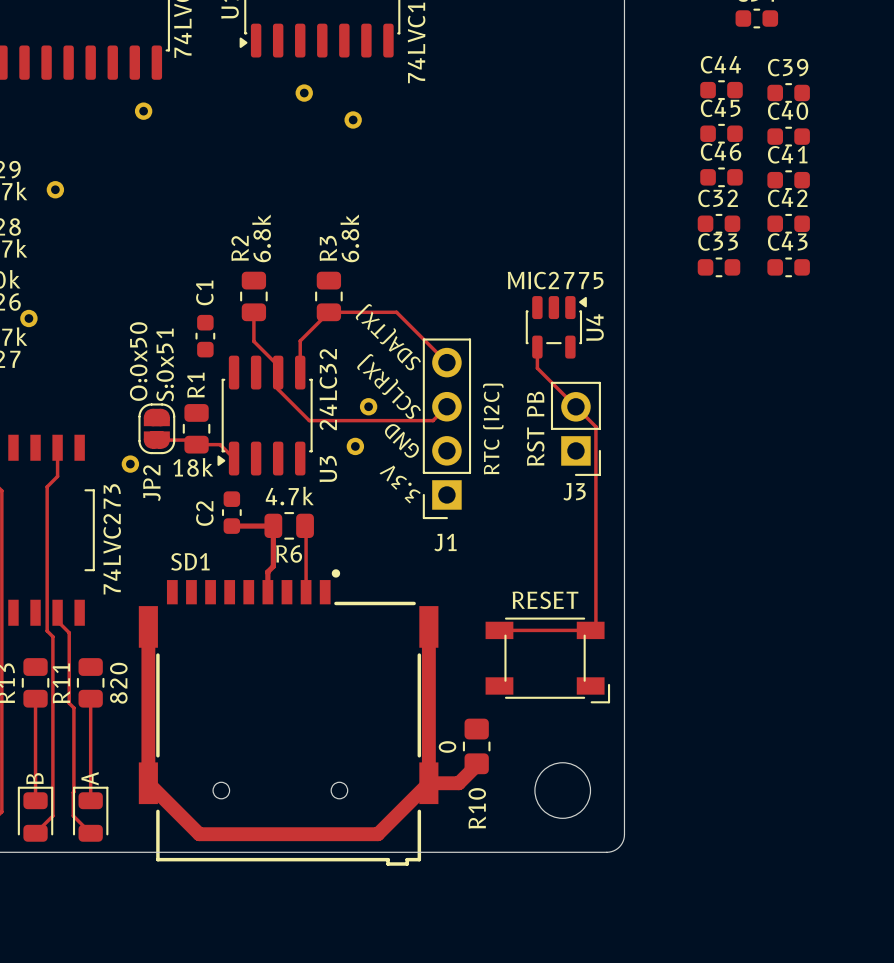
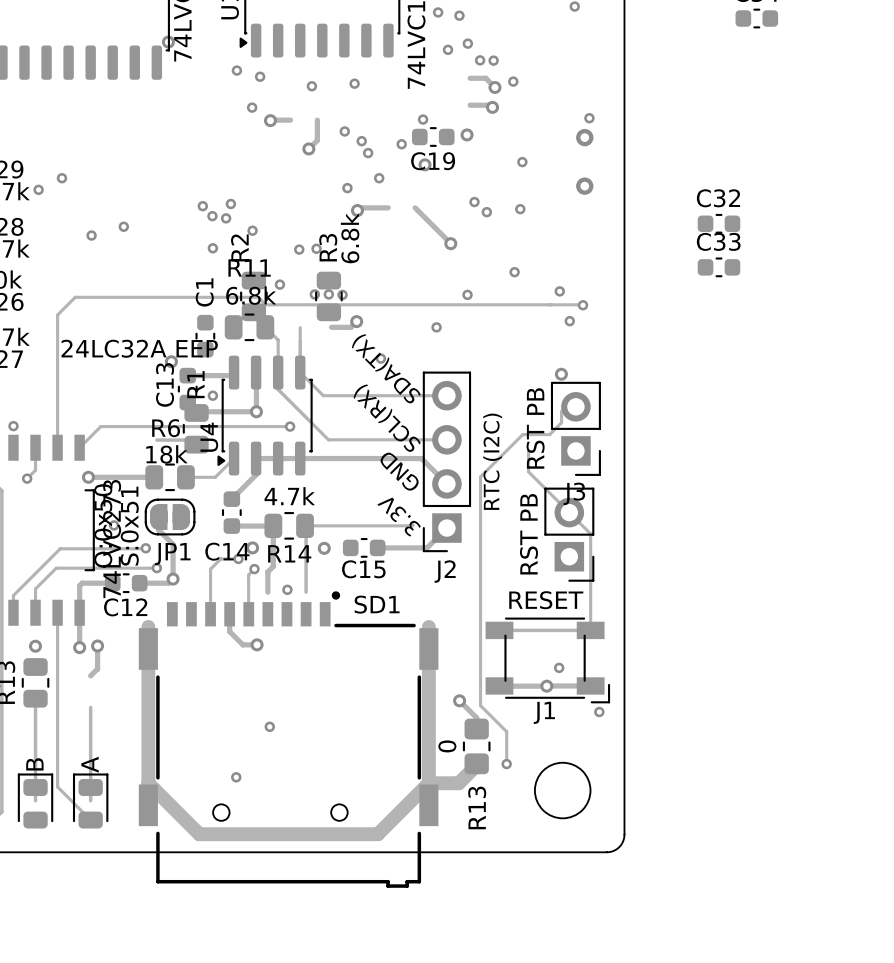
via: none -> (574, 6)
via: none -> (438, 12)
via: none -> (459, 15)
via: none -> (168, 42)
via: none -> (467, 43)
via: none -> (448, 49)
via: none -> (480, 60)
via: none -> (493, 60)
via: none -> (236, 70)
via: none -> (260, 76)
track: none -> (470, 78) (485, 78) (495, 87)
via: none -> (513, 81)
via: none -> (354, 83)
via: none -> (311, 86)
via: none -> (495, 87)
C44: (721, 90) -> none
C39: (788, 92) -> none
part: (304, 93) -> none
track: none -> (470, 105) (490, 105) (492, 107)
via: none -> (252, 107)
via: none -> (492, 107)
part: (143, 111) -> none
via: none -> (589, 118)
part: (353, 119) -> none
via: none -> (423, 119)
via: none -> (270, 120)
track: none -> (290, 120) (270, 120)
track: none -> (317, 120) (317, 140) (308, 148)
via: none -> (344, 131)
C45: (721, 133) -> none
via: none -> (467, 134)
C40: (788, 136) -> none
C19: none -> (433, 137)
part: none -> (584, 137)
via: none -> (361, 141)
via: none -> (401, 144)
via: none -> (308, 148)
via: none -> (368, 153)
via: none -> (522, 162)
via: none -> (424, 164)
C46: (721, 177) -> none
via: none -> (62, 178)
via: none -> (379, 178)
C41: (788, 180) -> none
part: none -> (584, 186)
via: none -> (347, 188)
via: none -> (38, 189)
part: (55, 189) -> none
via: none -> (474, 202)
via: none -> (230, 203)
via: none -> (202, 206)
track: none -> (388, 207) (360, 207) (357, 210)
track: none -> (415, 207) (450, 243)
via: none -> (520, 209)
via: none -> (357, 210)
via: none -> (486, 212)
via: none -> (212, 216)
via: none -> (226, 218)
C42: (788, 223) -> none
via: none -> (123, 226)
via: none -> (252, 230)
via: none -> (91, 235)
R2 value: 6.8k (261, 238) -> none
via: none -> (450, 243)
via: none -> (212, 248)
via: none -> (316, 248)
via: none -> (299, 249)
C43: (788, 267) -> none
via: none -> (514, 272)
via: none -> (279, 284)
via: none -> (559, 291)
via: none -> (314, 294)
via: none -> (328, 294)
via: none -> (342, 294)
via: none -> (467, 294)
via: none -> (583, 305)
track: (253, 312) (253, 341) (278, 365) -> none
part: (28, 318) -> none
track: none -> (356, 321) (350, 327) (331, 327)
via: none -> (356, 321)
via: none -> (569, 321)
track: none -> (265, 327) (278, 340) (278, 372)
via: none -> (436, 327)
U4: MIC2775 (556, 327) -> none
J1 text: SDA(TX) (388, 337) -> none
J1 footprint: [422, 338, 472, 520] -> [544, 487, 595, 582]
track: (300, 340) (328, 312) (396, 312) (446, 362) -> (300, 340) (300, 327)
track: (537, 347) (537, 368) (595, 426) (595, 625) -> none
via: none -> (380, 358)
via: none -> (171, 361)
track: none -> (234, 372) (231, 375) (187, 375)
track: none -> (256, 372) (256, 411) (196, 411) (187, 402)
track: none -> (300, 372) (323, 395) (446, 395)
via: none -> (561, 374)
J1 text: SCL(RX) (389, 386) -> none
C13: none -> (187, 389)
U3 value: 24LC32 (328, 389) -> 24LC32A EEP (139, 348)
via: none -> (212, 395)
part: (368, 406) -> none
track: (446, 406) (433, 420) (309, 420) -> (446, 439) (328, 439) (309, 420)
via: none -> (256, 411)
track: none -> (561, 411) (561, 422) (549, 434) (522, 434) (480, 476) (480, 705) (506, 731) (506, 764)
via: none -> (13, 426)
track: none -> (290, 426) (100, 426) (79, 447)
via: none -> (290, 426)
JP2: (156, 428) -> none
J1 text: RTC (I2C) (493, 429) -> RST PB (528, 534)
J1 text: GND (401, 441) -> none
track: (196, 444) (220, 444) (234, 458) -> (185, 477) (215, 477) (234, 458)
part: (355, 446) -> none
track: none -> (35, 447) (35, 470) (27, 478)
track: (57, 447) (57, 476) (47, 486) (47, 630) (52, 636) (52, 815) (35, 833) -> (57, 447) (57, 314) (75, 297) (258, 297) (265, 304) (583, 305)
track: none -> (528, 450) (528, 471) (590, 533) (590, 630)
J2: none -> (446, 461)
part: (130, 464) -> none
R1 value: 18k (193, 467) -> none
U3 name: U3 (328, 469) -> U4 (209, 437)
track: none -> (88, 477) (154, 477)
via: none -> (88, 477)
R6: none -> 18k (170, 477)
via: none -> (27, 478)
track: none -> (446, 483) (421, 458) (256, 458) (256, 474) (231, 499)
J1 text: 3.3V (400, 484) -> none
C2 name: C2 (204, 513) -> C14 (227, 551)
track: none -> (158, 517) (158, 530) (173, 544) (173, 579) (168, 583) (139, 583)
JP1: none -> (170, 517)
track: none -> (413, 524) (305, 525)
via: none -> (114, 525)
track: none -> (446, 528) (427, 547) (377, 547)
J1 name position: J1 (445, 542) -> J1 (544, 712)
via: none -> (252, 547)
C15: none -> (364, 547)
track: none -> (145, 548) (60, 548) (13, 595) (13, 612)
via: none -> (145, 548)
via: none -> (324, 548)
R6 name: R6 (289, 553) -> R14 (289, 553)
track: none -> (238, 558) (220, 558) (210, 569) (210, 614)
via: none -> (238, 558)
SD1 name position: SD1 (190, 561) -> SD1 (377, 604)
track: none -> (156, 568) (56, 568) (35, 588) (35, 612)
via: none -> (156, 568)
track: none -> (254, 569) (248, 574) (248, 614)
via: none -> (254, 569)
via: none -> (173, 579)
track: none -> (112, 583) (82, 583) (79, 585) (79, 647)
C12: none -> (126, 583)
via: none -> (287, 589)
track: none -> (57, 612) (57, 786) (90, 820)
track: none -> (229, 614) (229, 631) (242, 644) (257, 644)
track: (57, 621) (69, 632) (69, 703) (73, 707) (73, 815) (90, 833) -> none
via: none -> (257, 644)
track: none -> (97, 645) (97, 668) (90, 675)
via: none -> (97, 645)
via: none -> (35, 646)
via: none -> (79, 647)
via: none -> (559, 667)
R11 rotation: 0° (90, 682) -> 90° clockwise (249, 327)
R11 position: (90, 682) -> (249, 327)
R11 value: 820 (118, 683) -> 6.8k (251, 295)
track: none -> (547, 685) (590, 685)
track: none -> (499, 686) (546, 686)
via: none -> (546, 686)
track: none -> (459, 700) (476, 717) (476, 729)
via: none -> (459, 700)
via: none -> (599, 712)
SD1 position: (288, 717) -> (288, 739)
via: none -> (269, 726)
via: none -> (506, 764)
via: none -> (236, 777)
R10 name: R10 (477, 808) -> R13 (477, 807)
part position: (35, 814) -> (35, 800)
part position: (90, 814) -> (90, 800)

